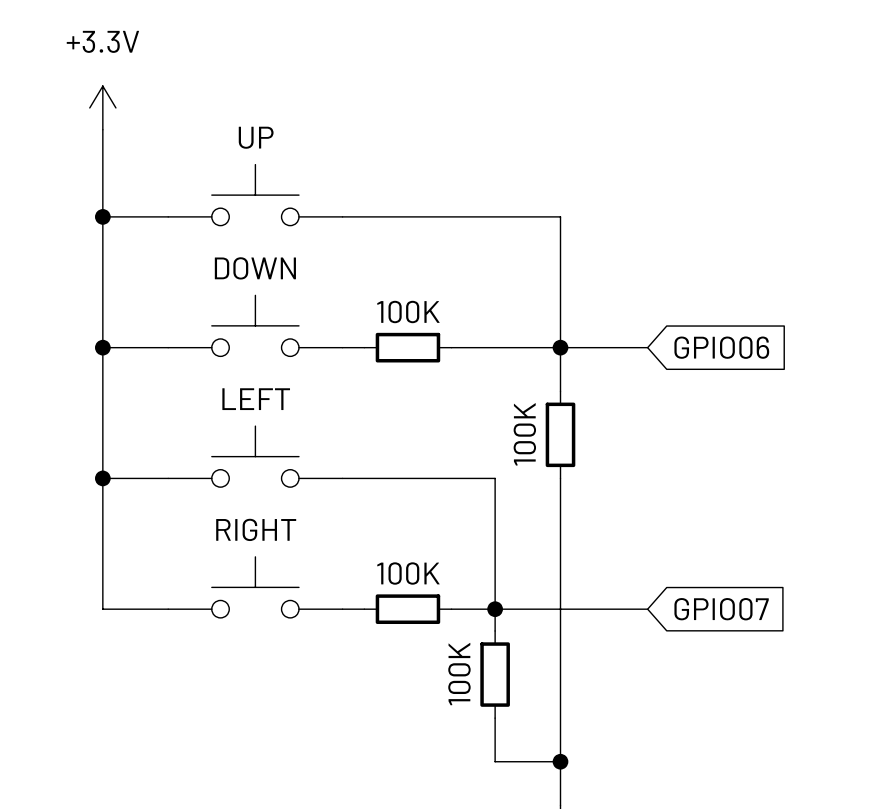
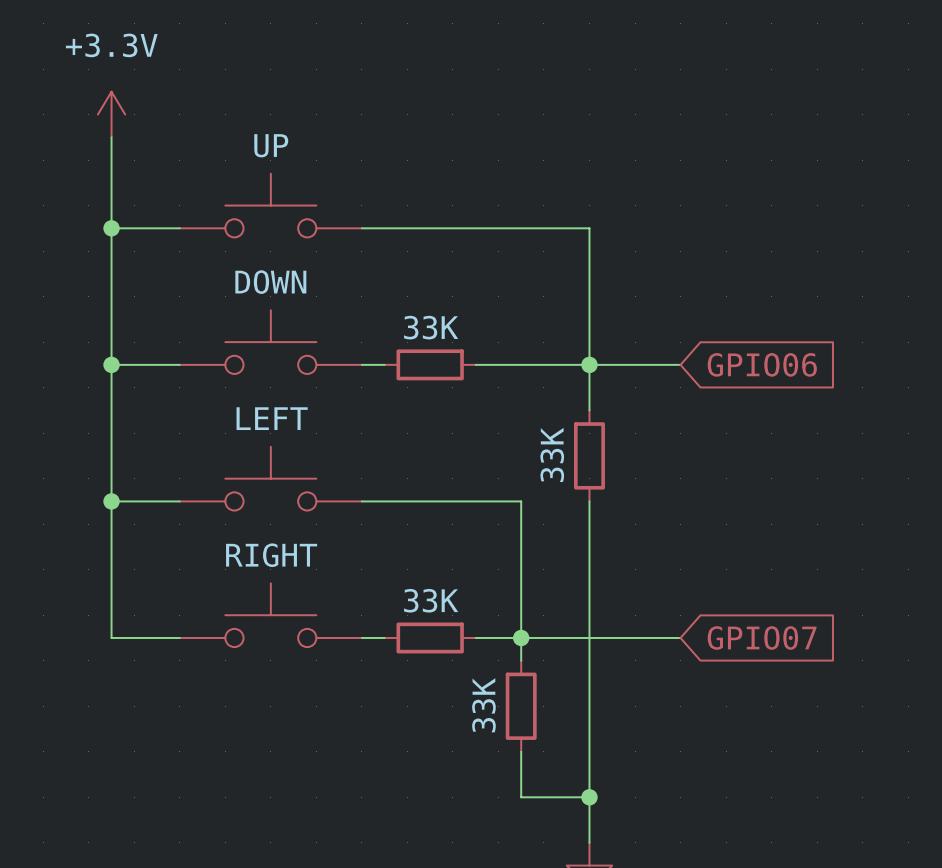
part value: 100K (408, 311) -> 33K (431, 327)
part value: 100K (524, 434) -> 33K (552, 454)
part value: 100K (408, 573) -> 33K (431, 600)
part value: 100K (459, 674) -> 33K (483, 705)

